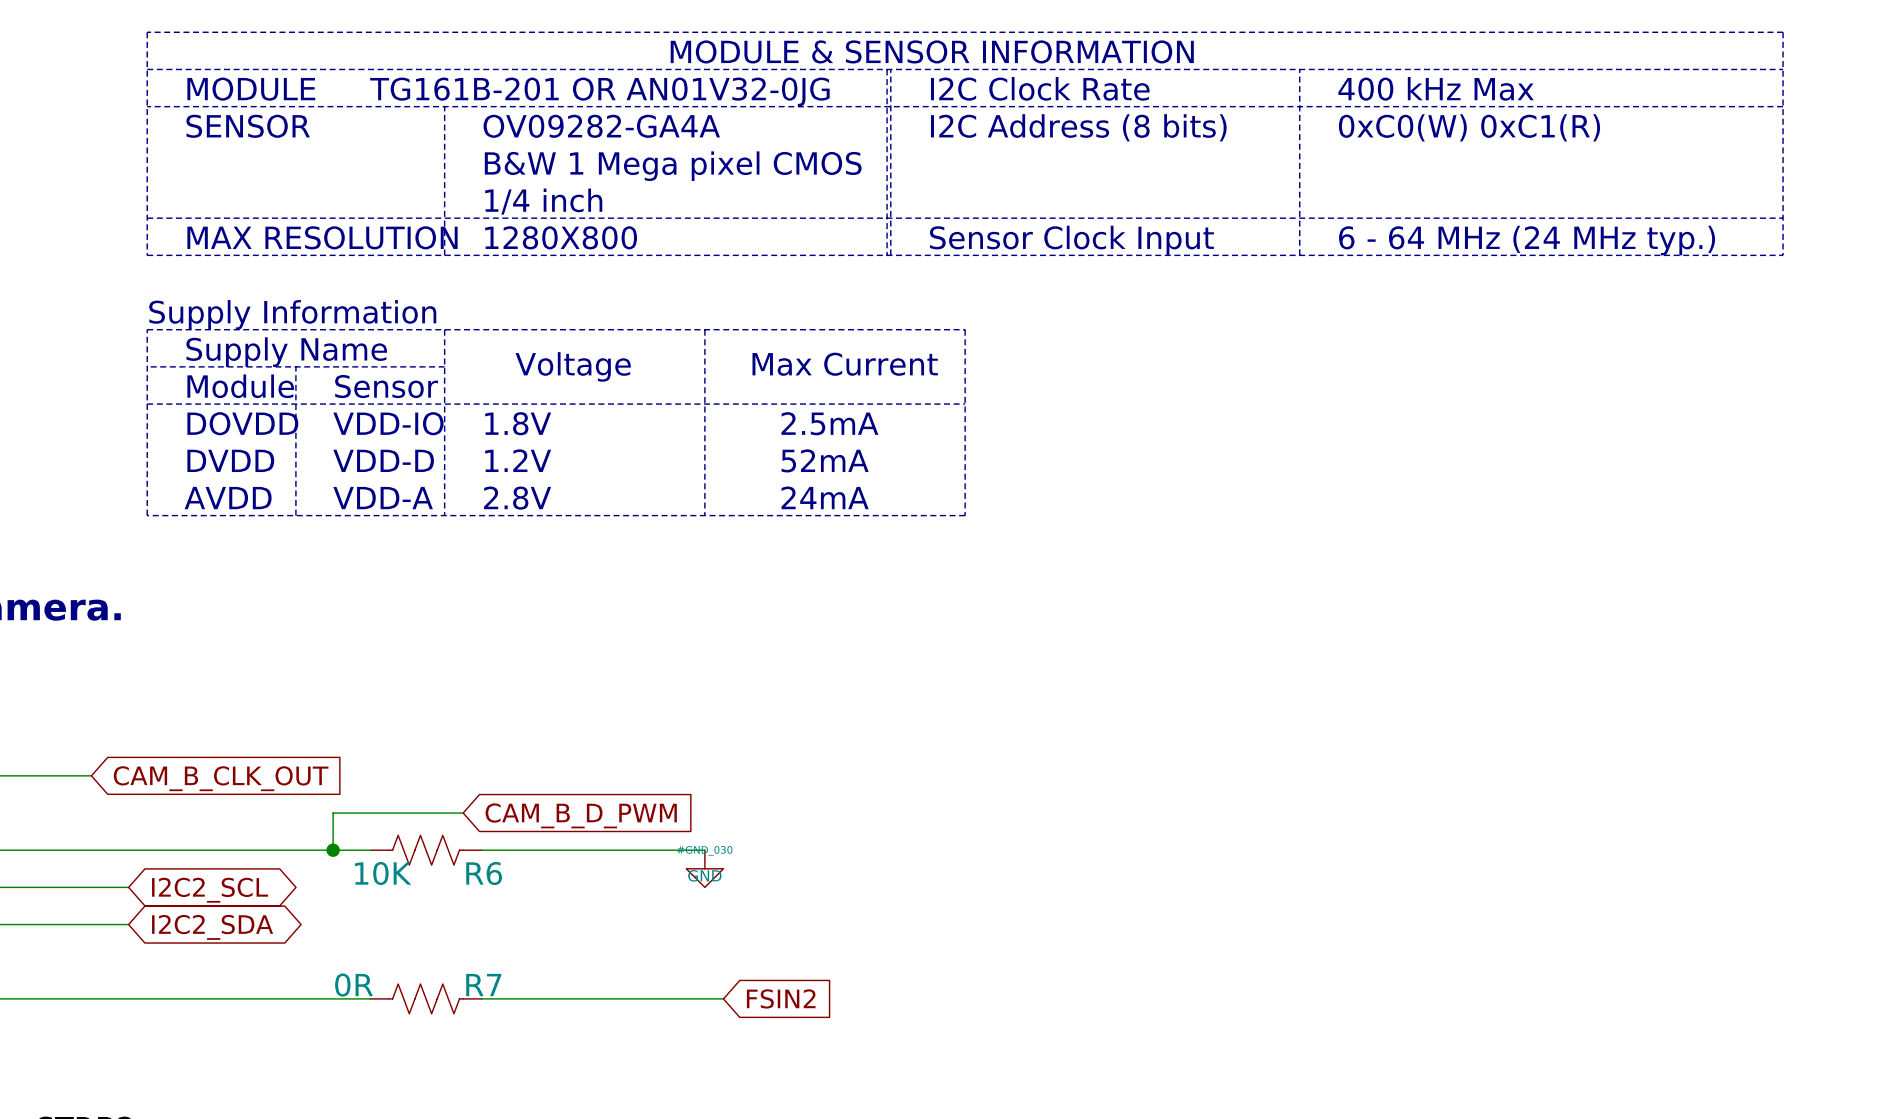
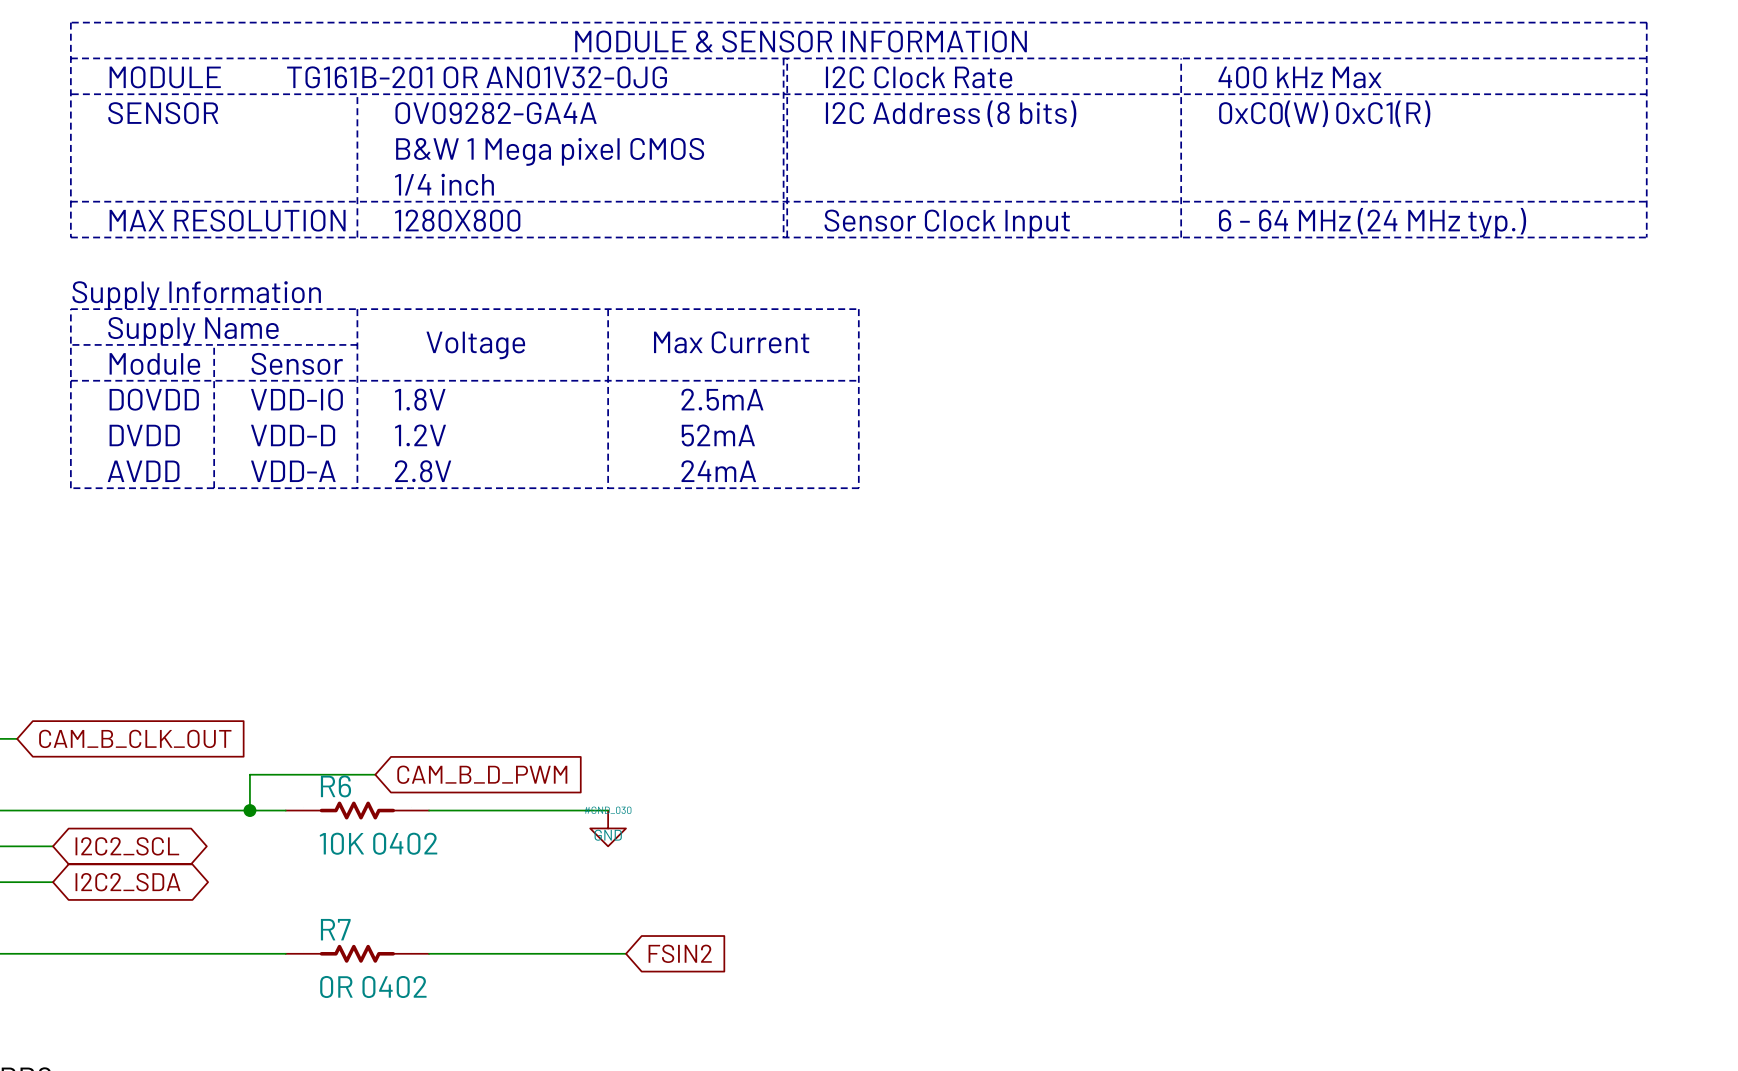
R6 symbol: [370, 835, 482, 866] -> [285, 801, 430, 820]
R6 value: 10K (383, 873) -> 10K 0402 (378, 843)
R6 name position: R6 (484, 873) -> R6 (335, 786)
R7 symbol: [370, 984, 482, 1014] -> [285, 944, 430, 963]
R7 value: 0R (354, 985) -> 0R 0402 (373, 987)
R7 name position: R7 (483, 985) -> R7 (335, 929)

